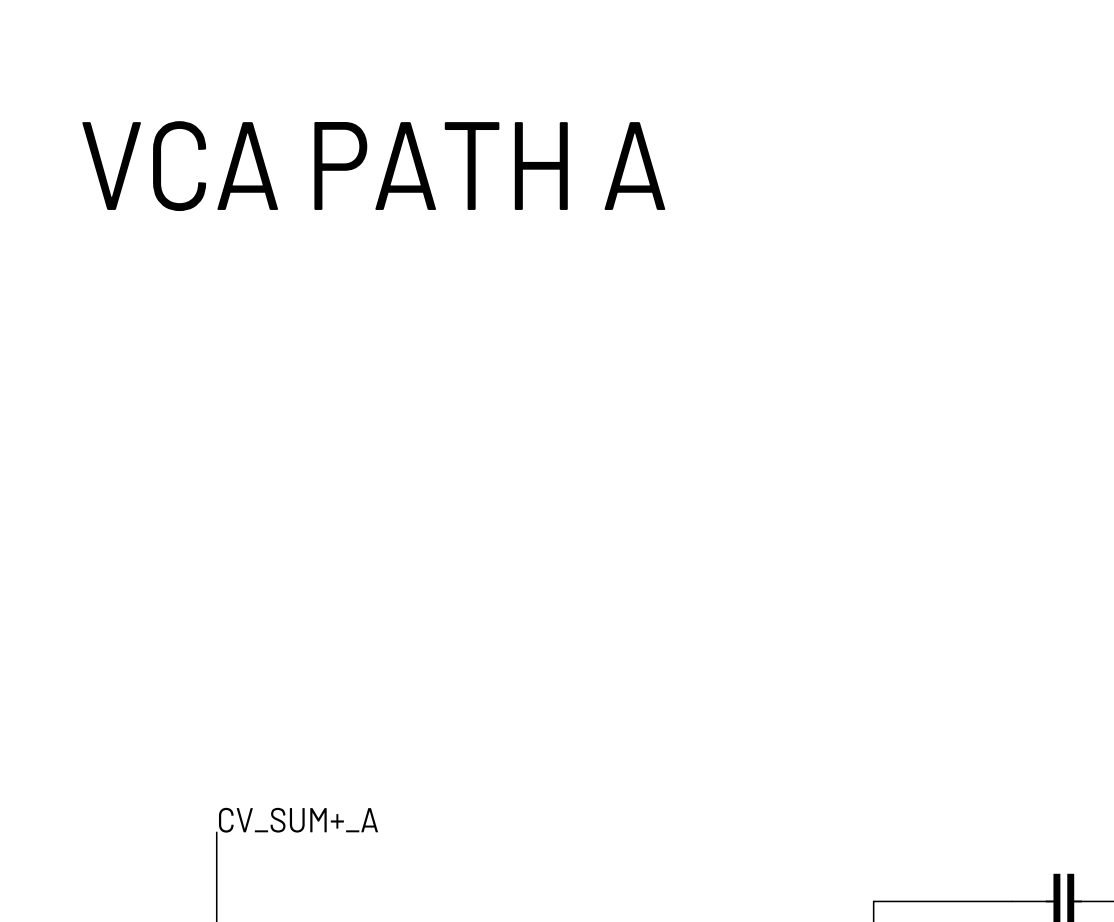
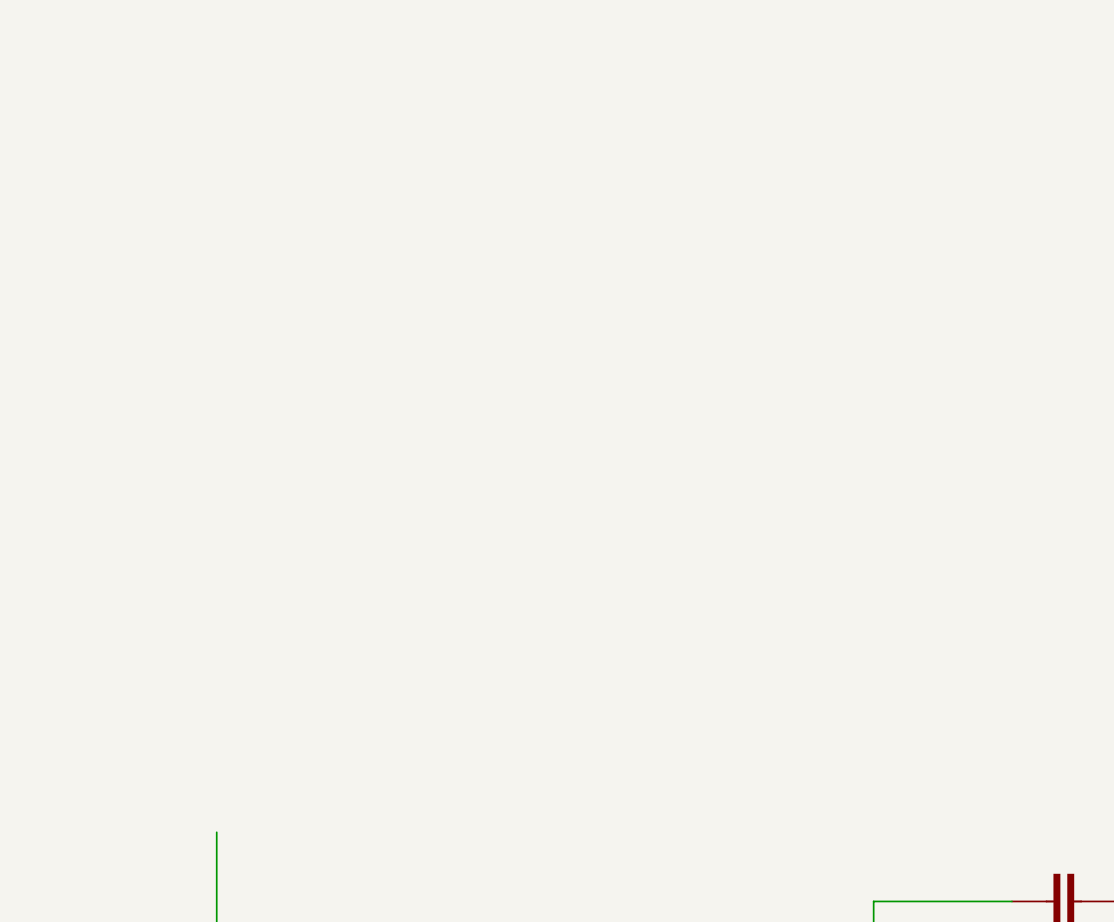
text: VCA PATH A (373, 166) -> none
label: CV_SUM+_A (298, 820) -> none

